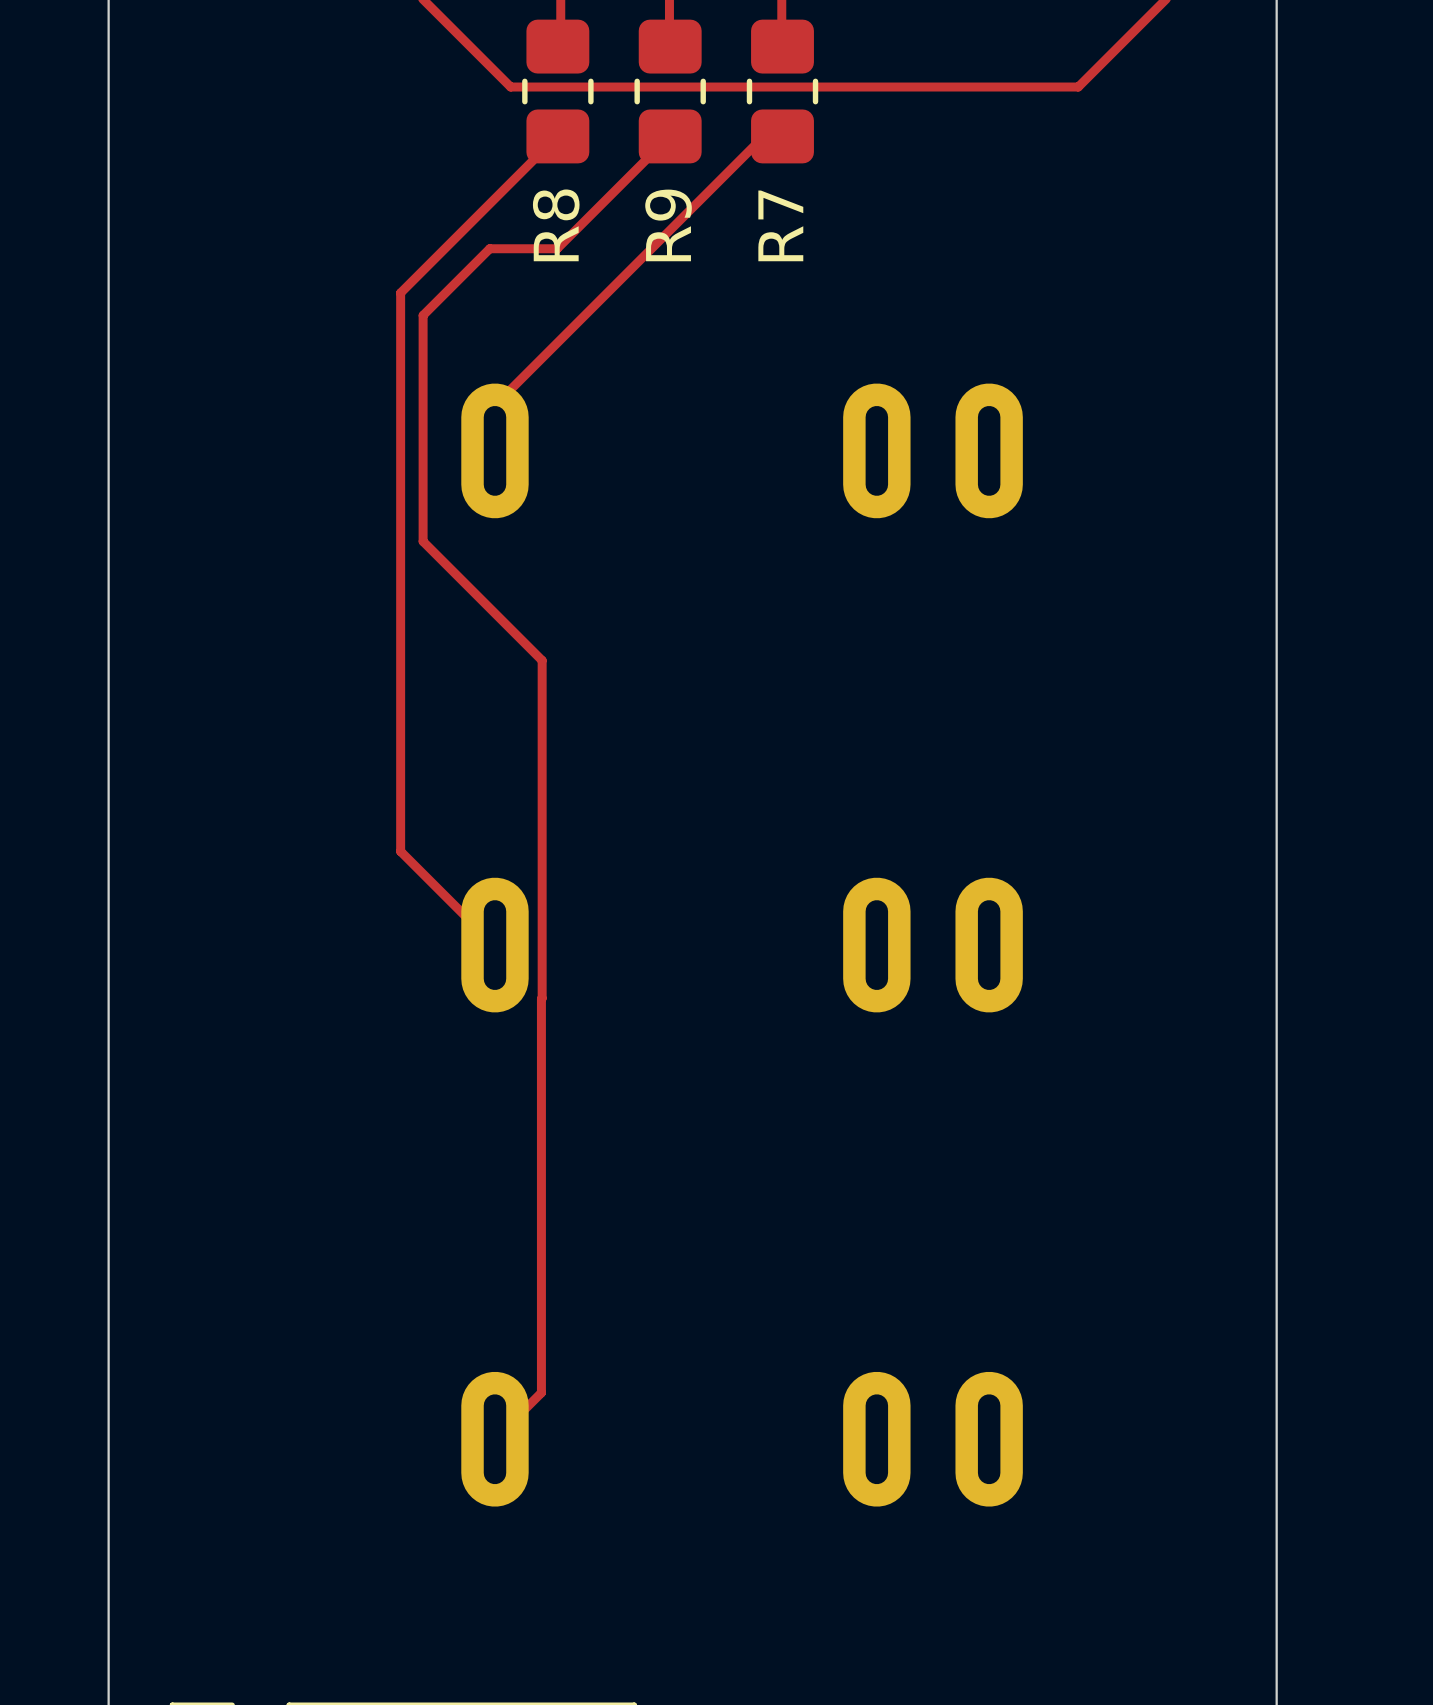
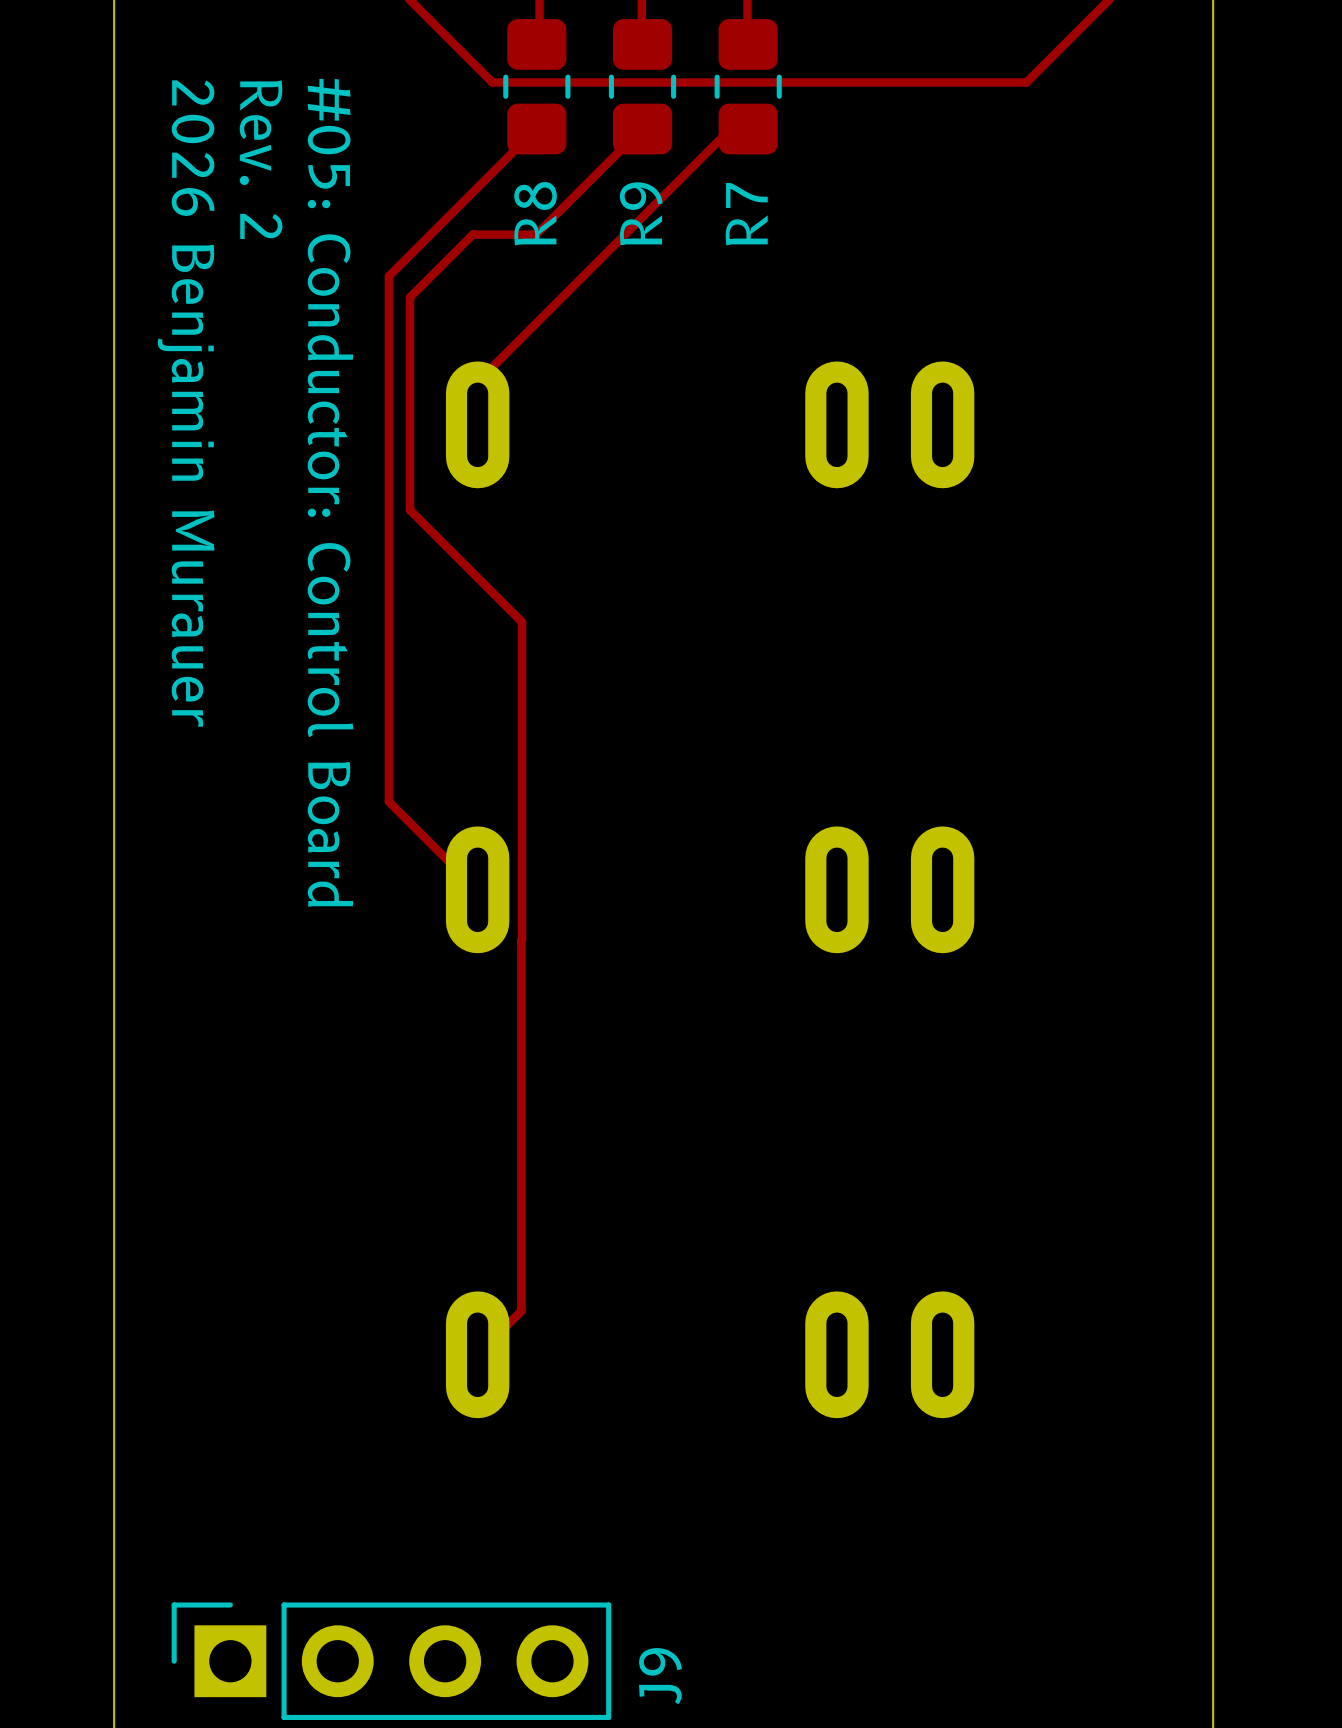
text: none -> Rev. 2 (261, 159)
text: none -> 2026 Benjamin Murauer (186, 403)
text: none -> #05: Conductor: Control Board (330, 492)

